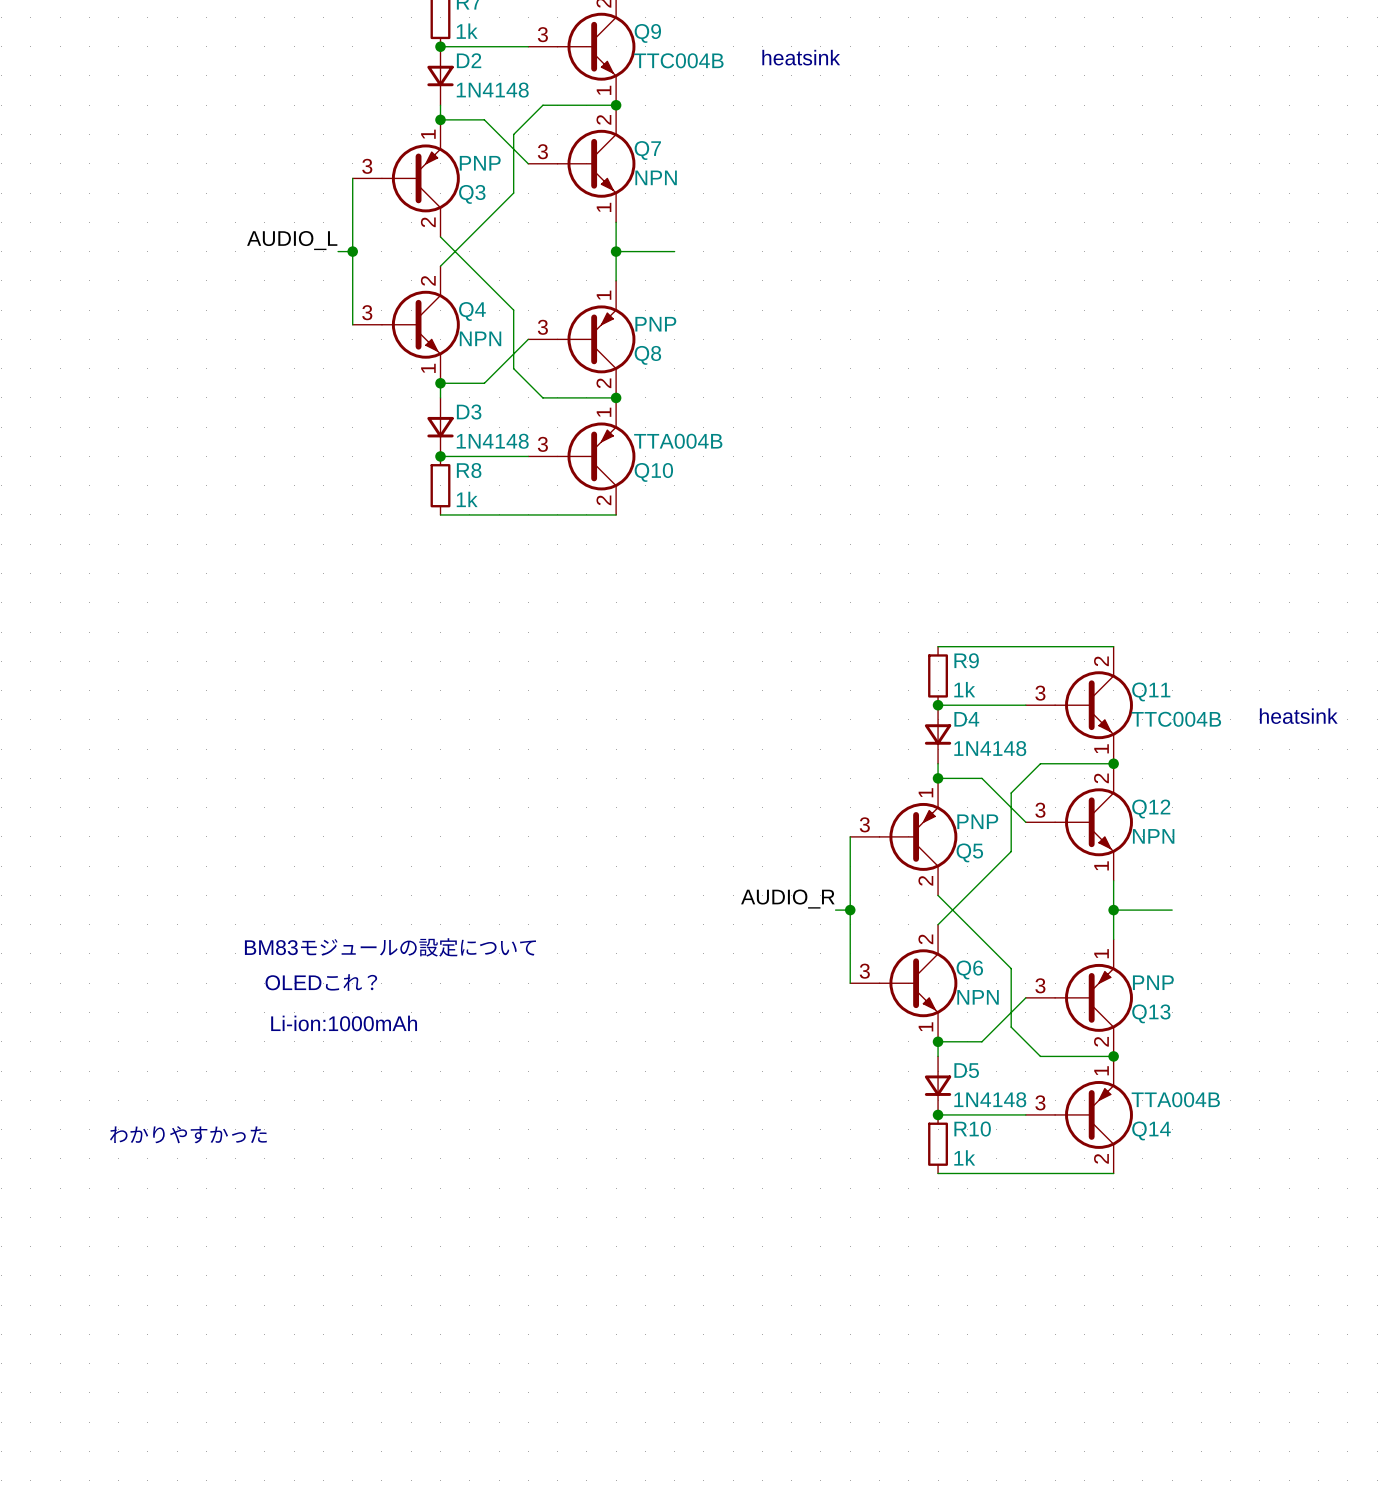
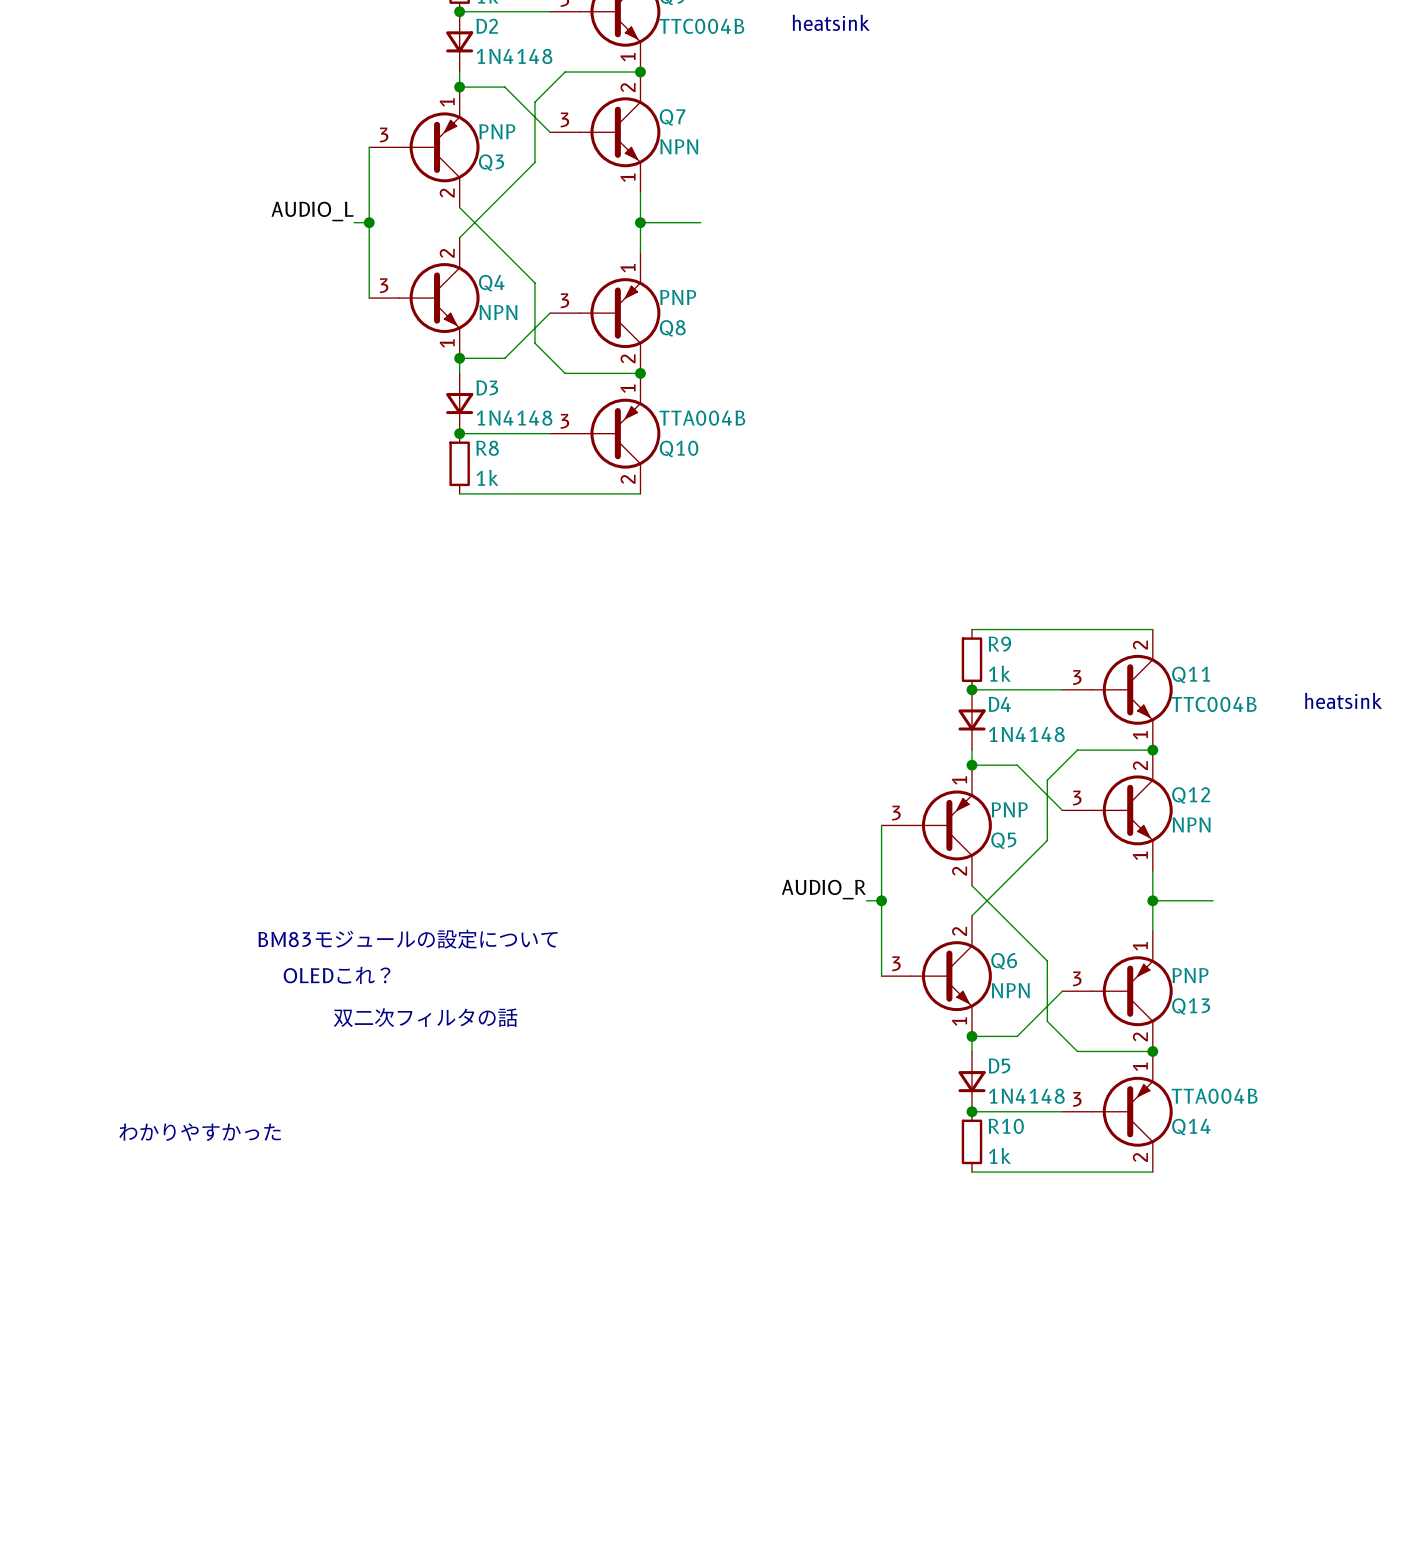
text: Li-ion:1000mAh (344, 1023) -> none
text: none -> 双二次フィルタの話 (425, 1017)

